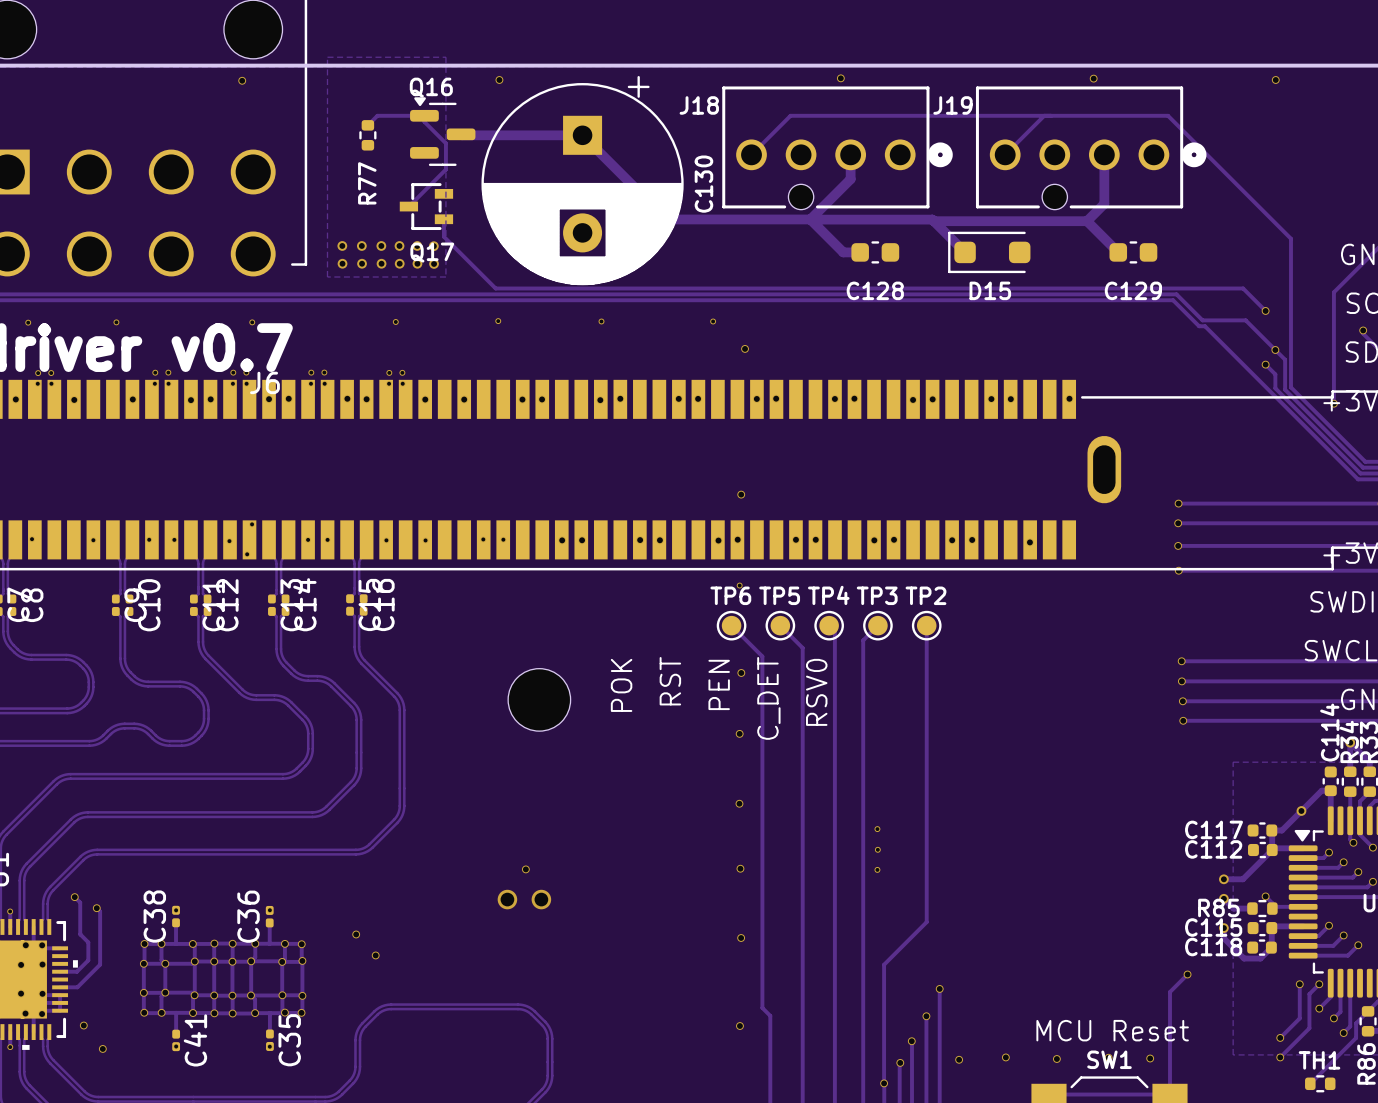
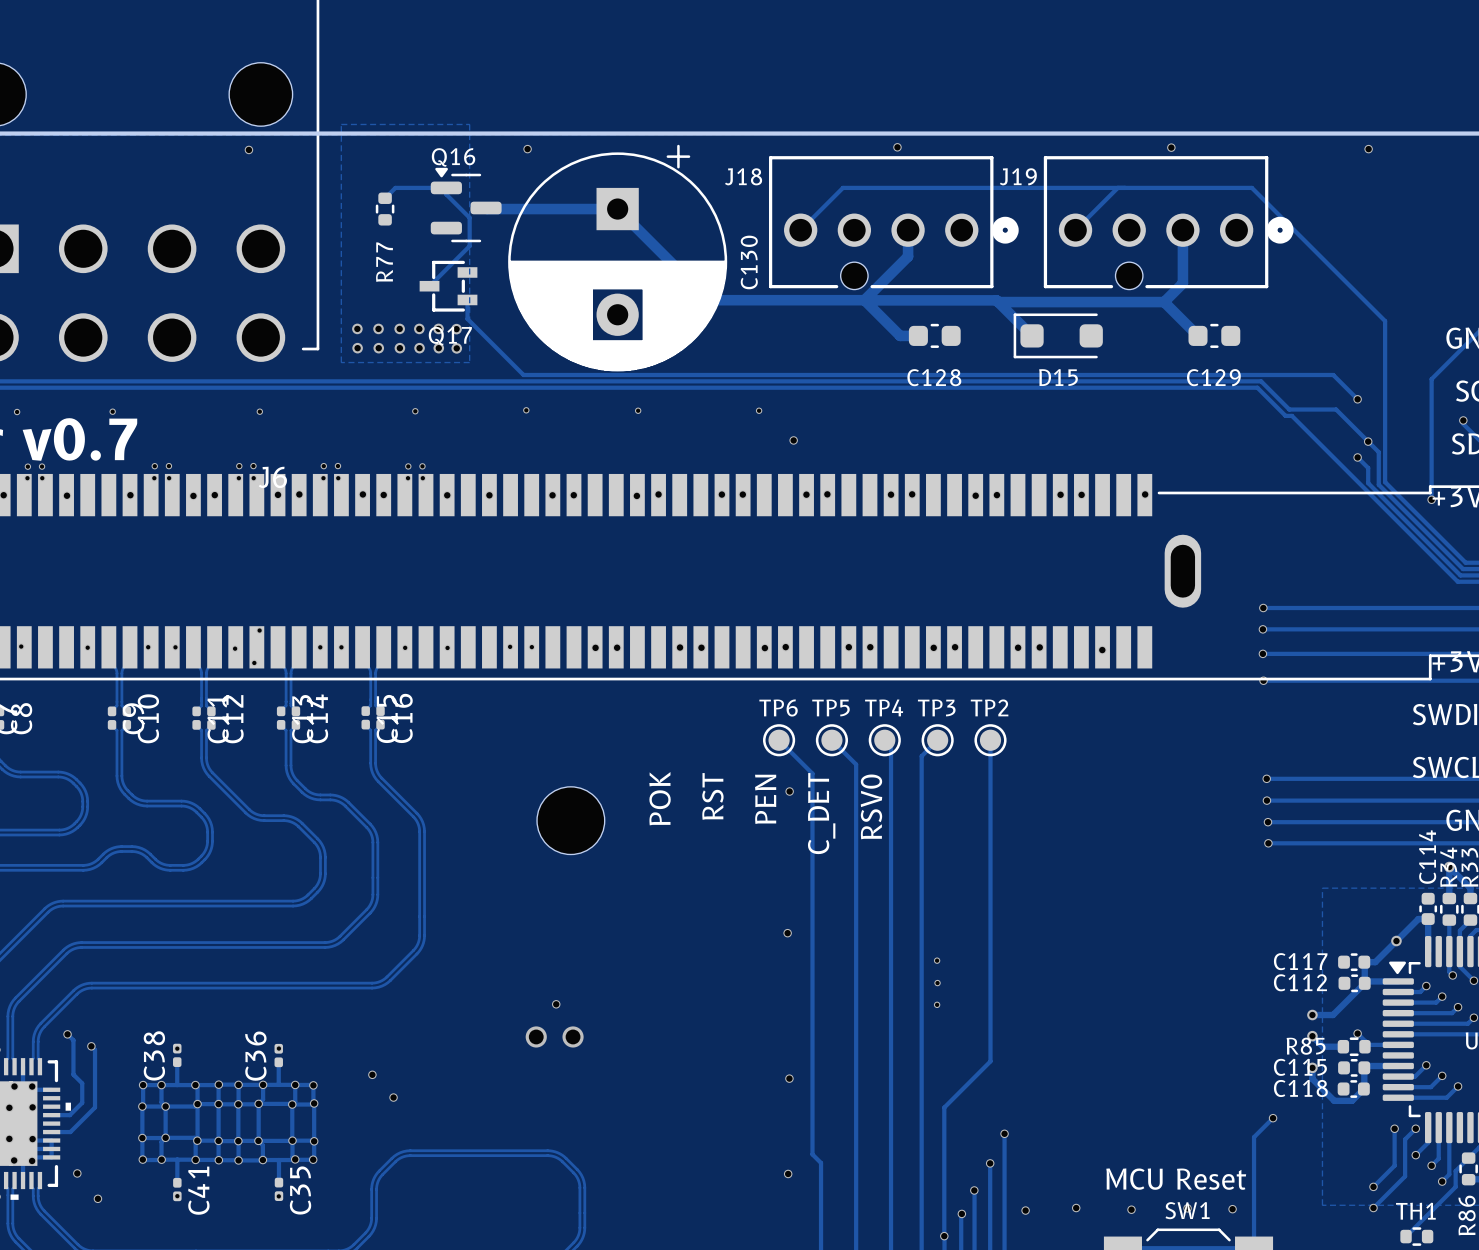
via: (741, 494) -> none
via: (739, 585) -> none
via: (739, 733) -> none
via: (740, 868) -> none

